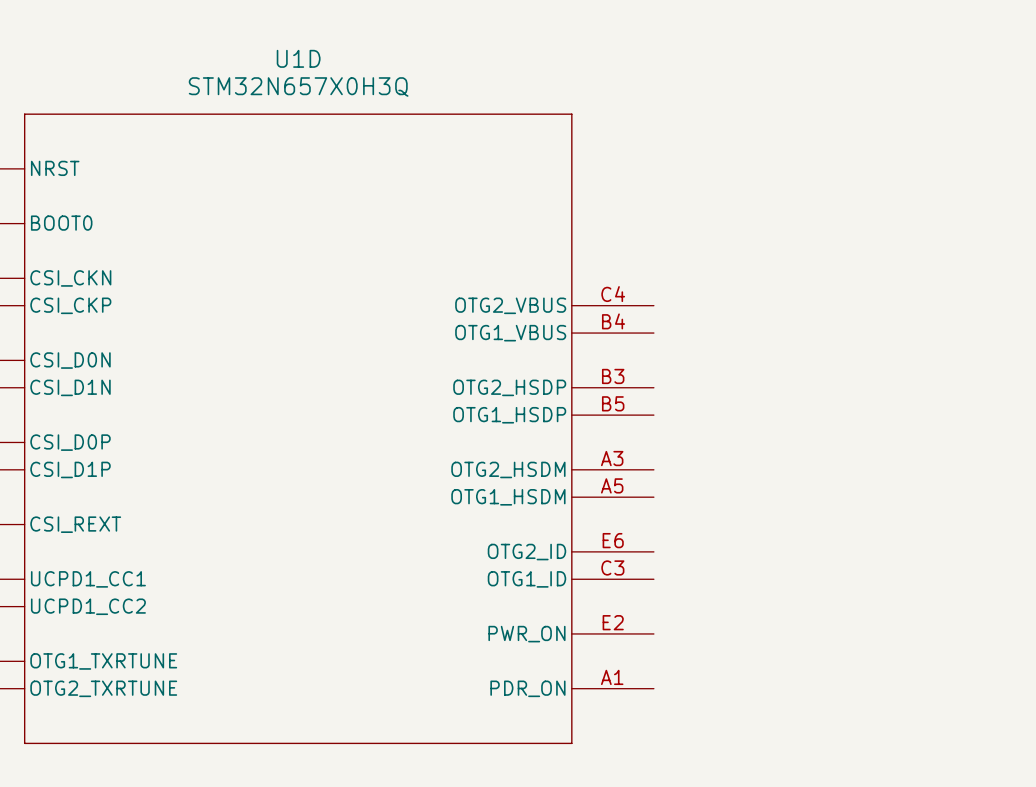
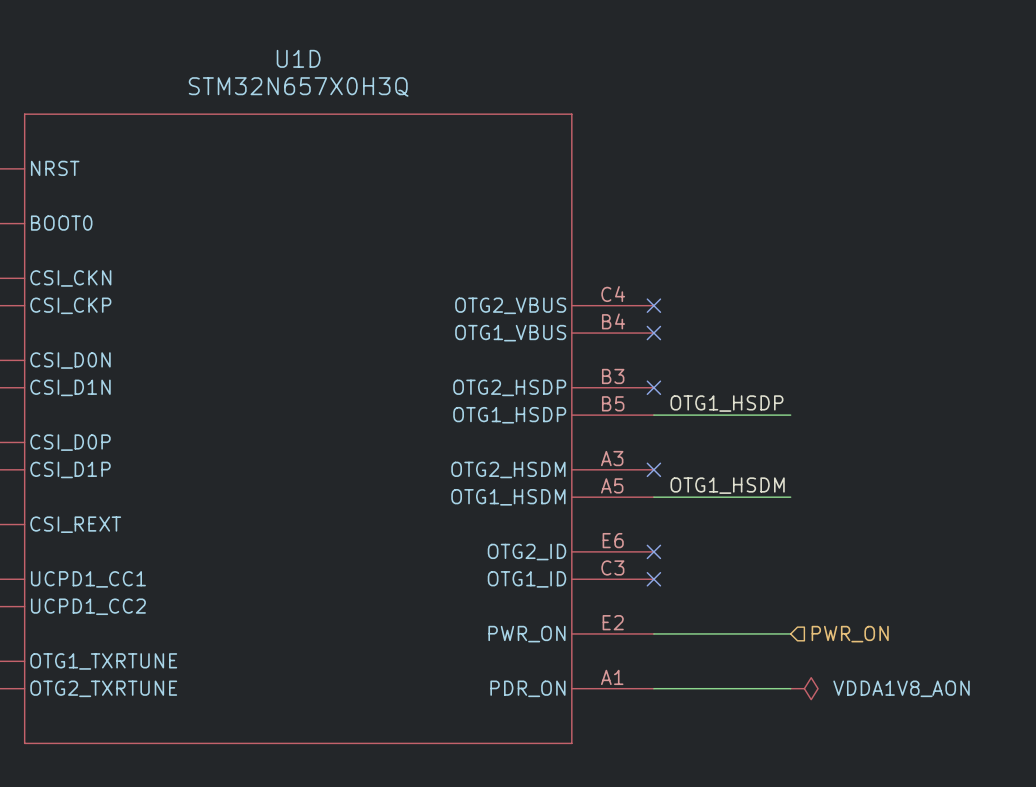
no-connect mark: none -> (653, 305)
no-connect mark: none -> (653, 333)
no-connect mark: none -> (653, 387)
label: none -> OTG1_HSDP (726, 403)
wire: none -> (653, 415) (790, 415)
no-connect mark: none -> (653, 469)
label: none -> OTG1_HSDM (727, 485)
wire: none -> (653, 497) (790, 497)
no-connect mark: none -> (653, 551)
no-connect mark: none -> (653, 579)
wire: none -> (653, 633) (790, 633)
hierarchical label: none -> PWR_ON (850, 634)
wire: none -> (653, 688) (790, 688)
power symbol: none -> VDDA1V8_AON (804, 688)

